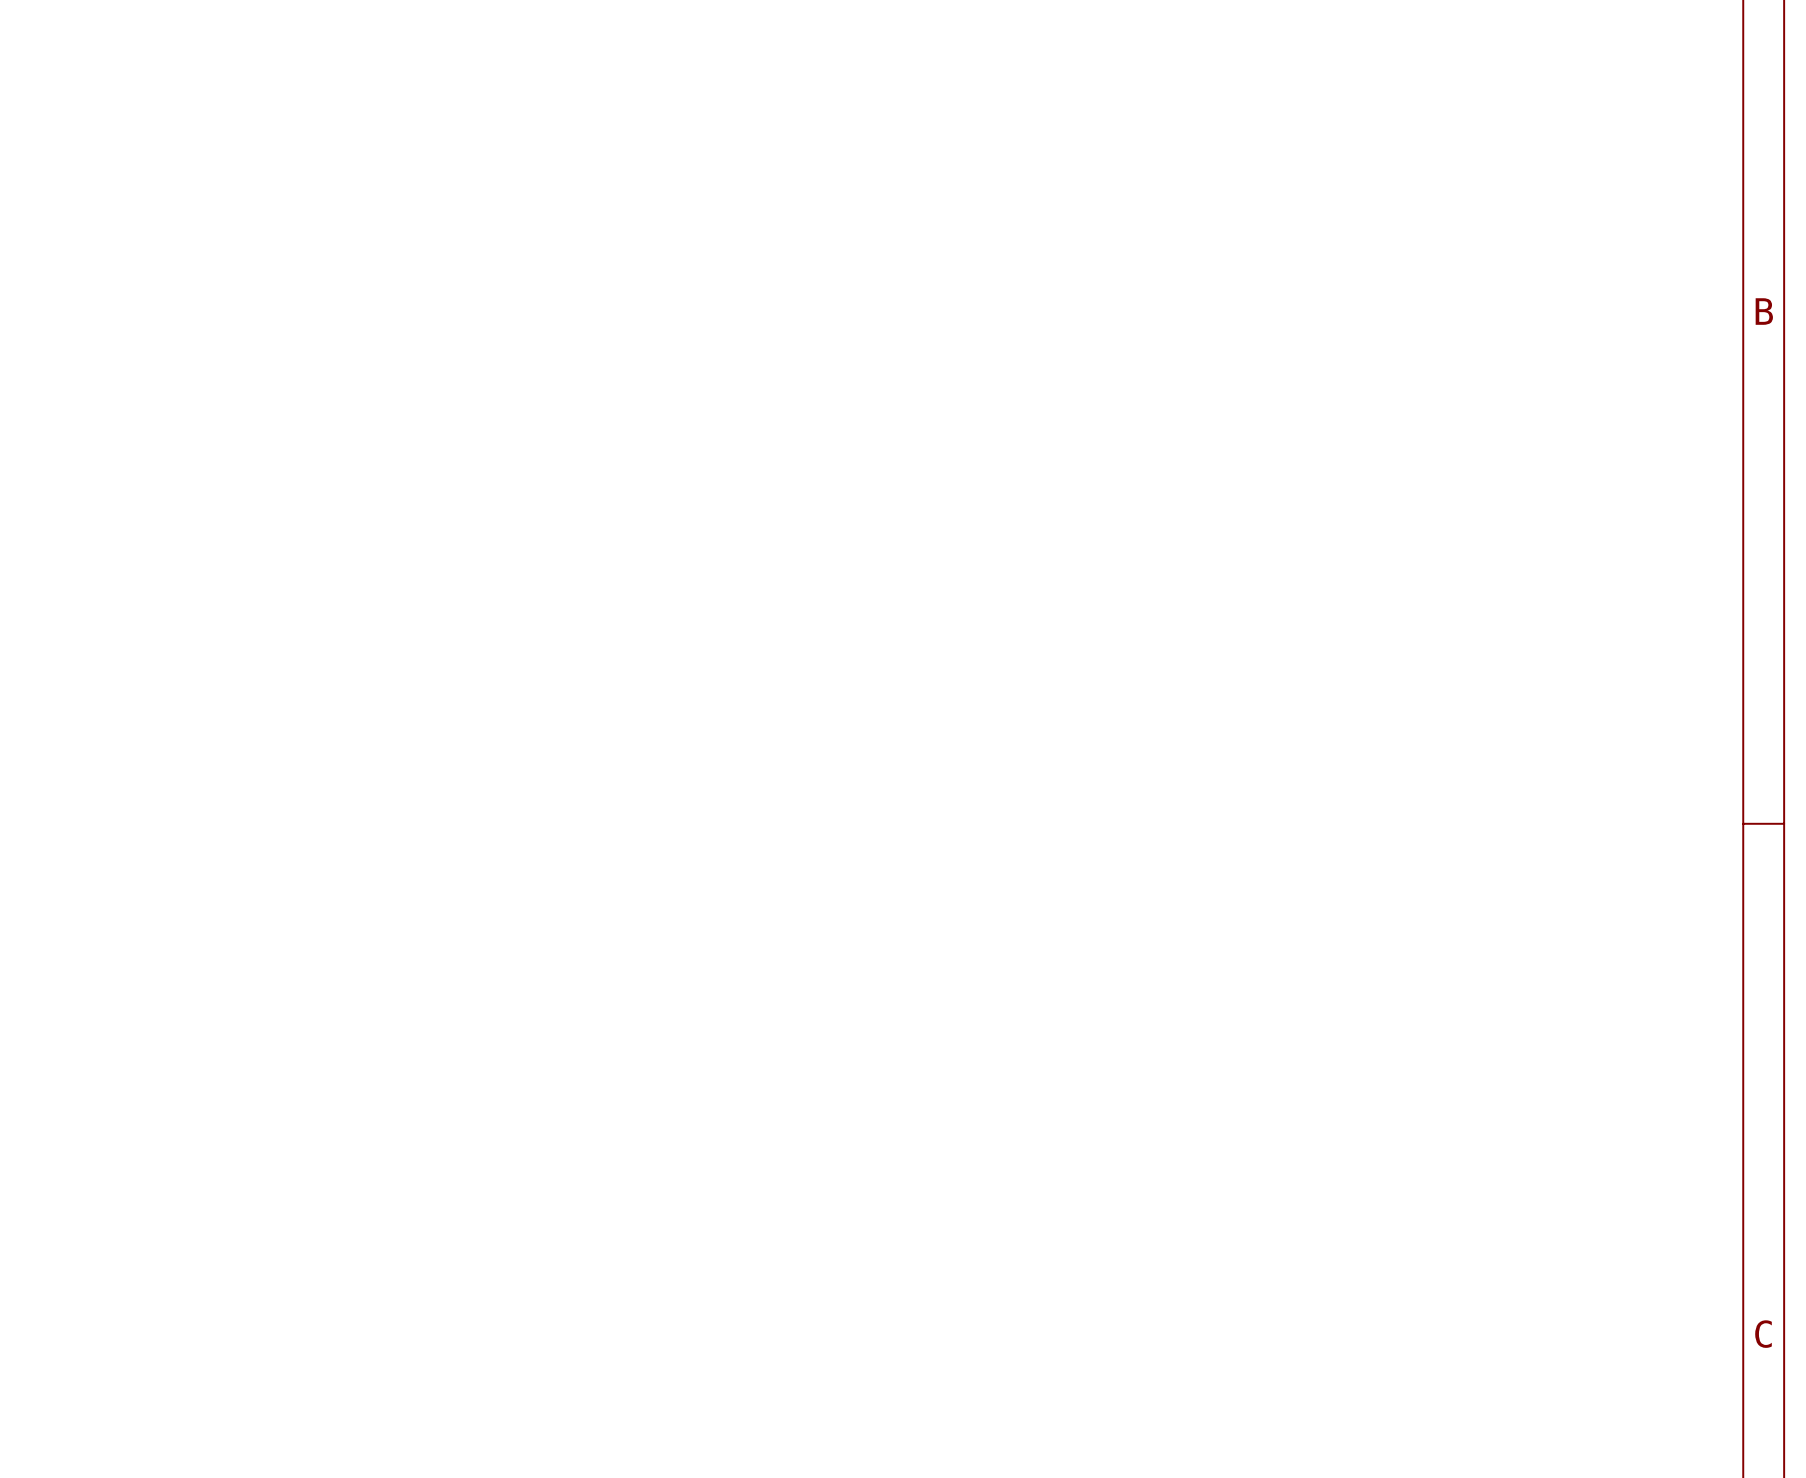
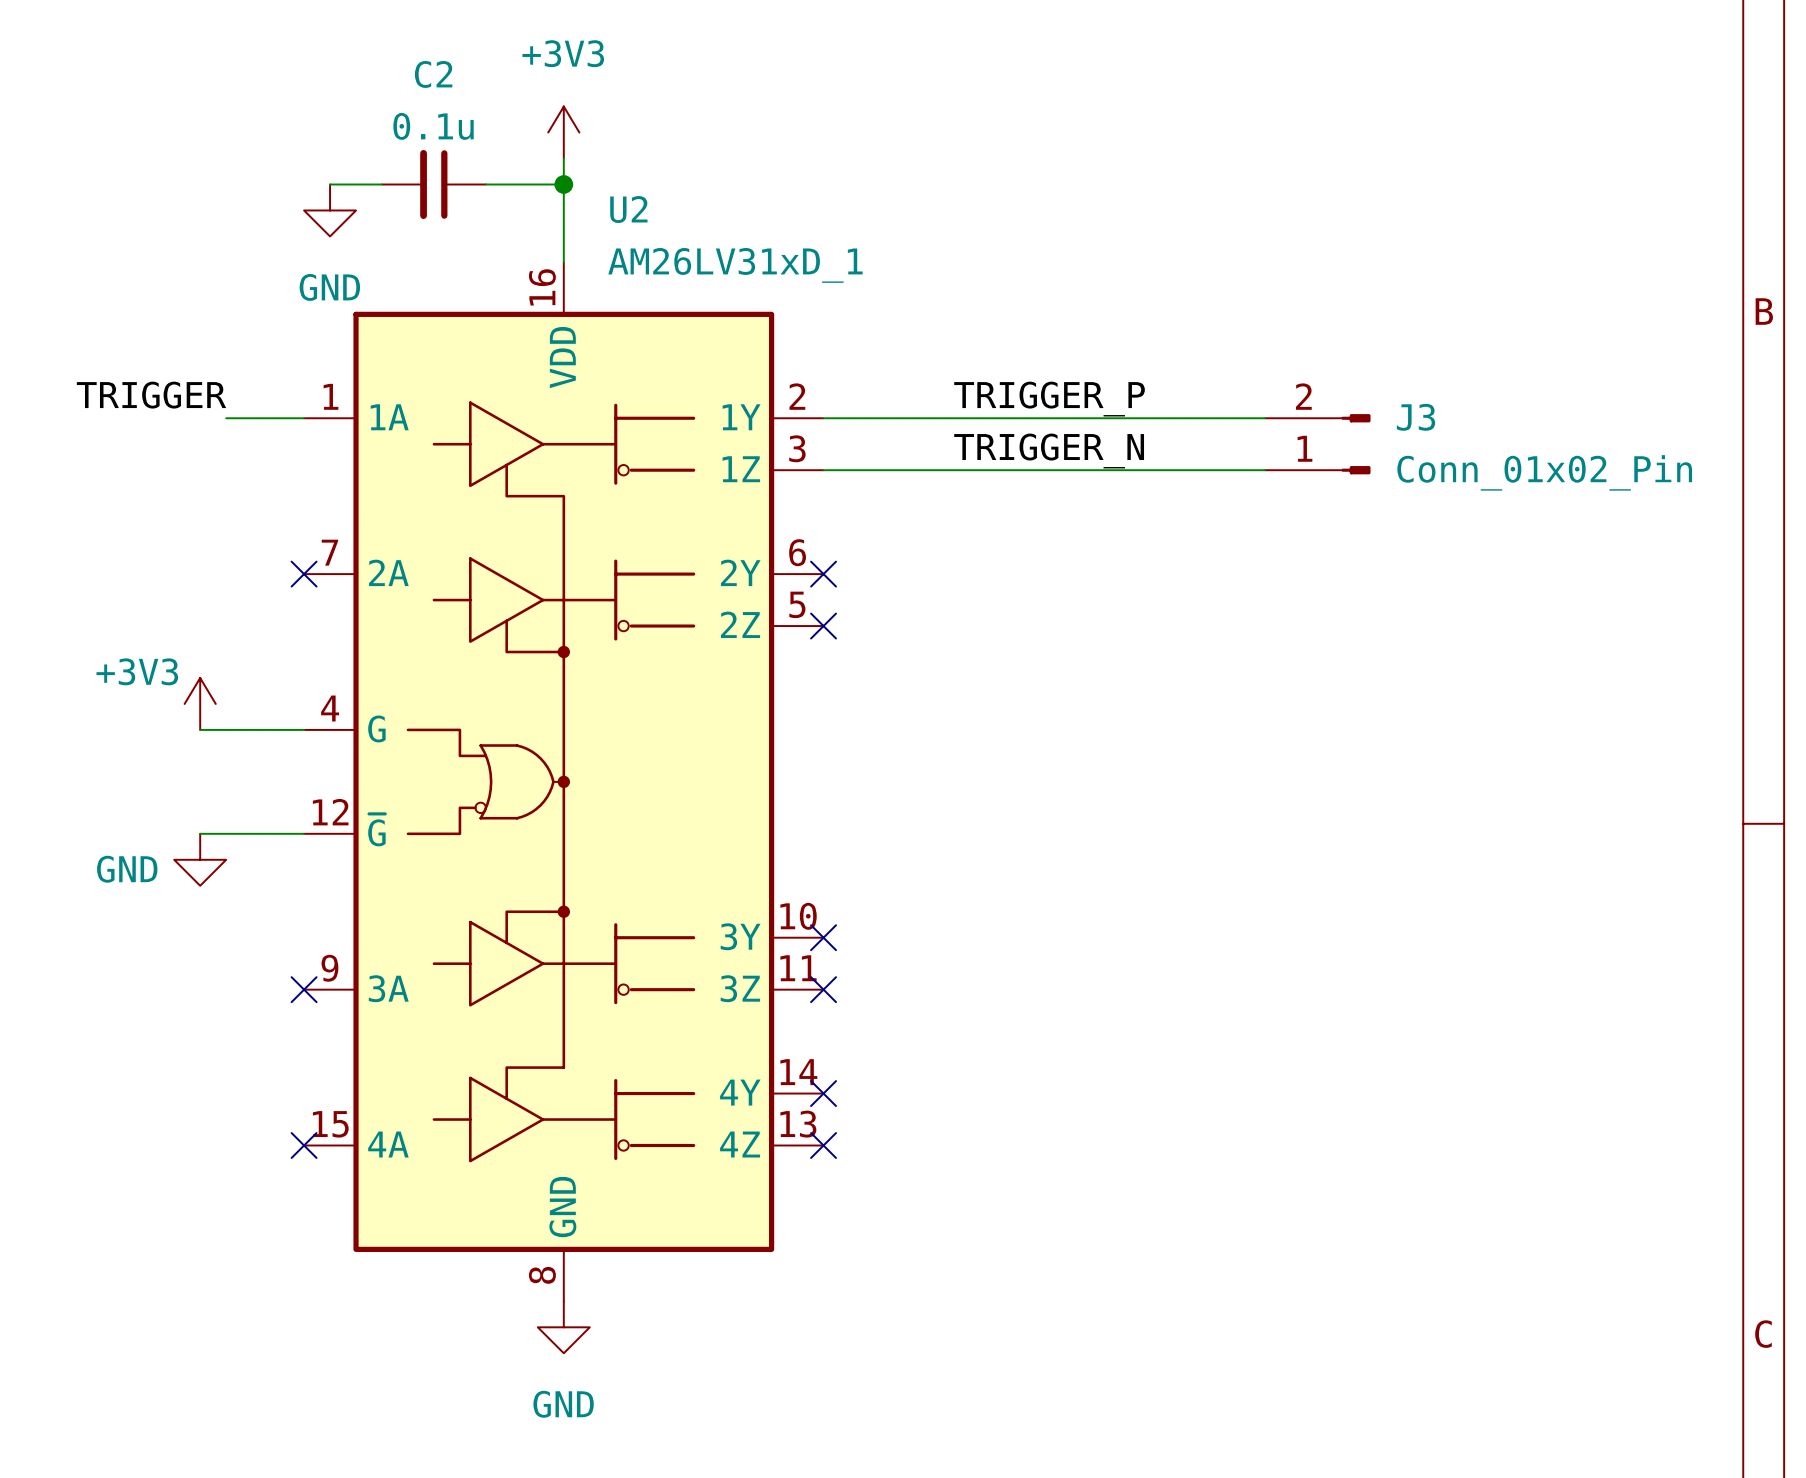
power symbol: none -> +3V3 (563, 132)
wire: none -> (563, 158) (563, 262)
wire: none -> (330, 184) (382, 184)
C2: none -> 0.1u (433, 184)
wire: none -> (485, 184) (563, 184)
junction: none -> (563, 184)
power symbol: none -> GND (330, 210)
label: none -> TRIGGER (151, 395)
label: none -> TRIGGER_P (1049, 399)
wire: none -> (226, 418) (304, 418)
wire: none -> (823, 418) (1265, 418)
J3: none -> Conn_01x02_Pin (1317, 444)
label: none -> TRIGGER_N (1049, 450)
wire: none -> (823, 470) (1265, 470)
no-connect mark: none -> (304, 574)
no-connect mark: none -> (823, 574)
no-connect mark: none -> (823, 626)
power symbol: none -> +3V3 (200, 703)
wire: none -> (200, 729) (304, 729)
U2: none -> AM26LV31xD_1 (563, 781)
wire: none -> (200, 833) (304, 833)
power symbol: none -> GND (200, 859)
no-connect mark: none -> (823, 937)
no-connect mark: none -> (304, 989)
no-connect mark: none -> (823, 989)
no-connect mark: none -> (823, 1093)
no-connect mark: none -> (304, 1145)
no-connect mark: none -> (823, 1145)
power symbol: none -> GND (563, 1327)

